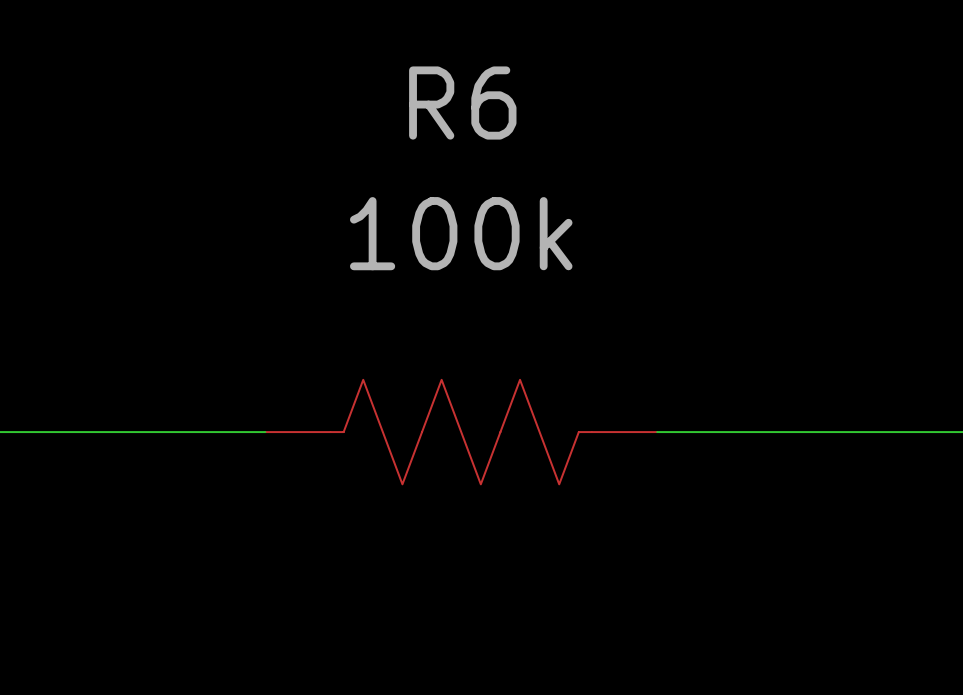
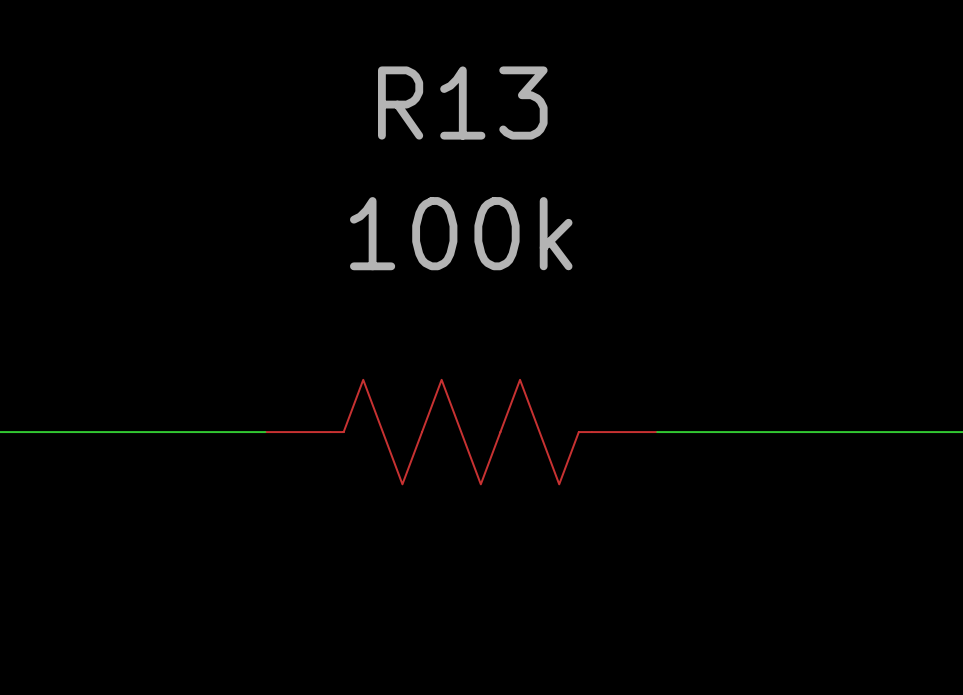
R6 name: R6 (462, 103) -> R13 (462, 103)

